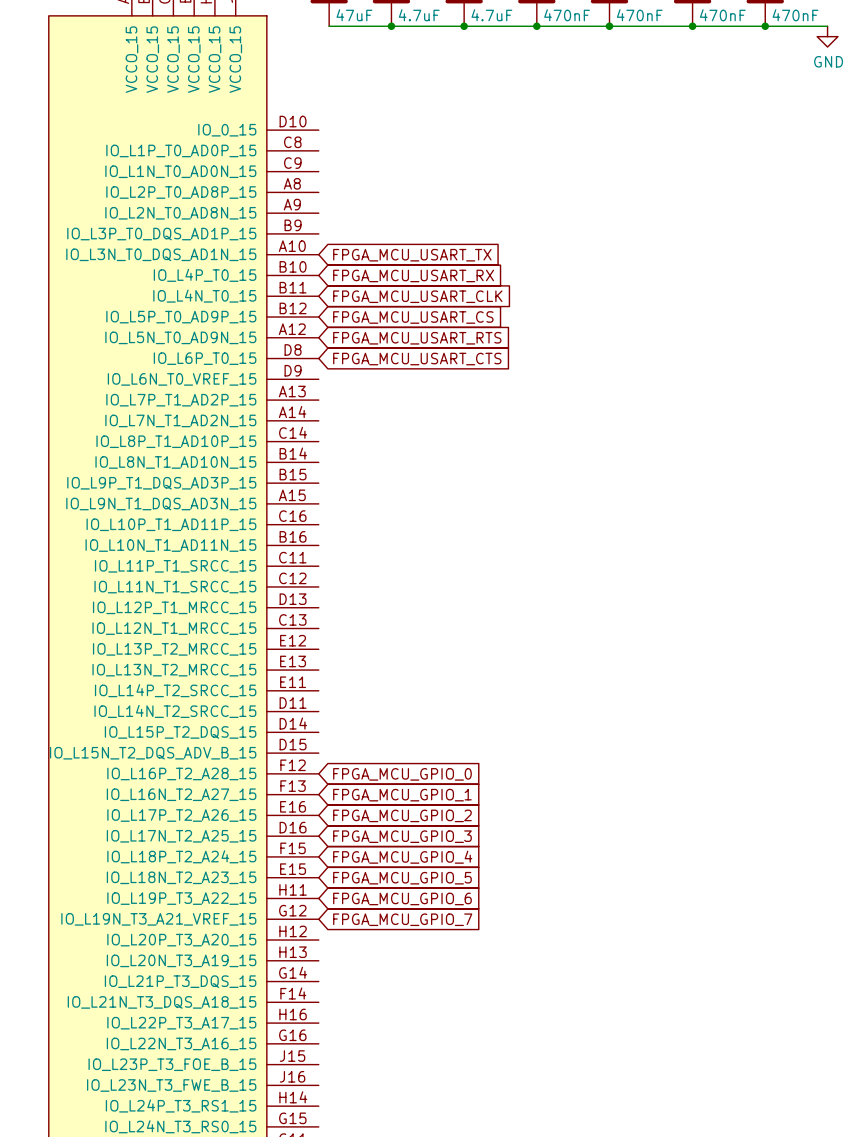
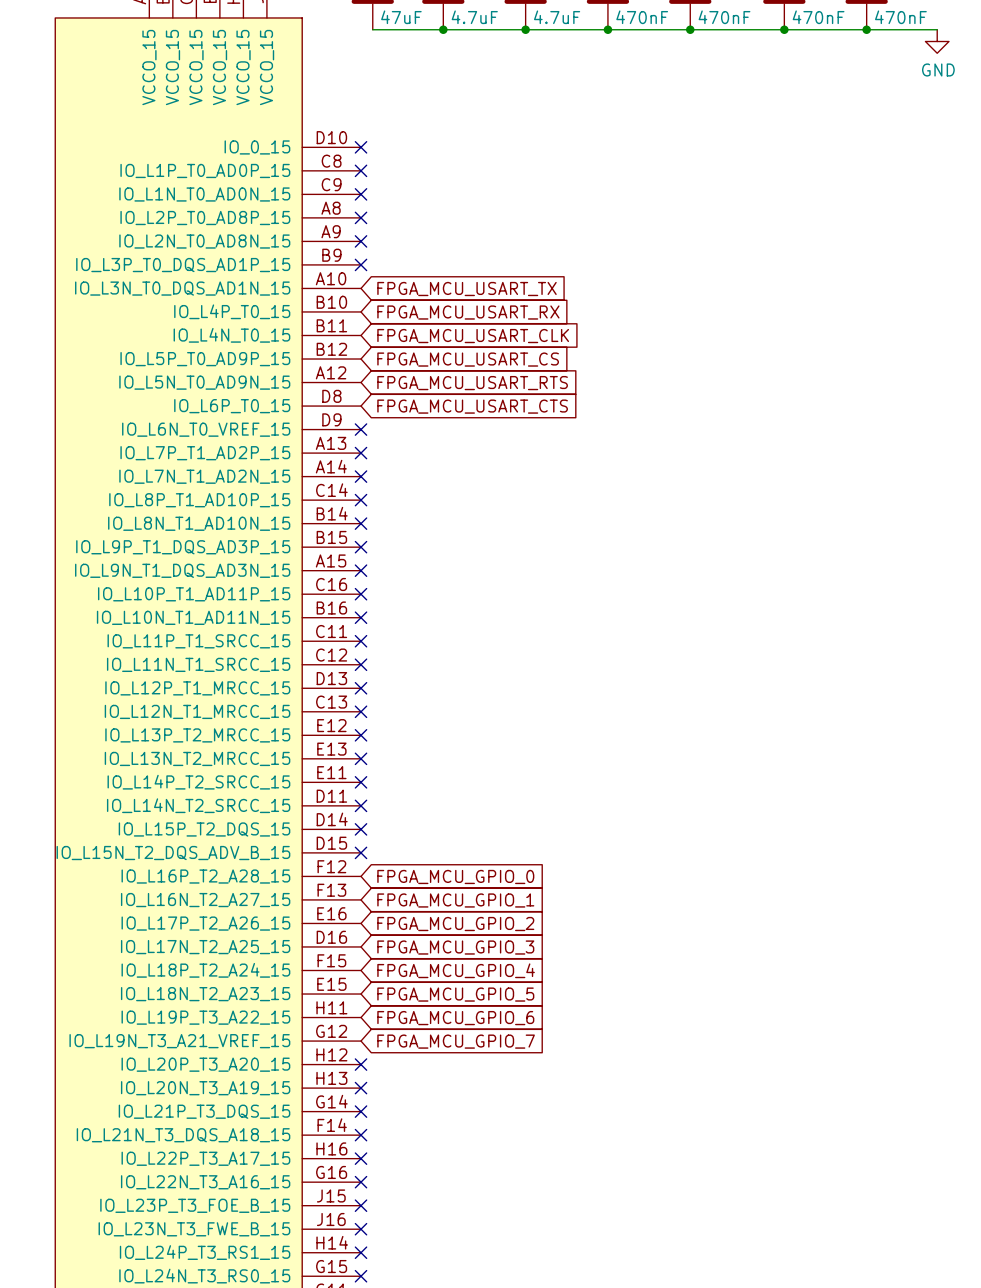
no-connect mark: none -> (361, 147)
no-connect mark: none -> (361, 170)
no-connect mark: none -> (361, 194)
no-connect mark: none -> (361, 217)
no-connect mark: none -> (361, 241)
no-connect mark: none -> (361, 264)
no-connect mark: none -> (361, 429)
no-connect mark: none -> (361, 453)
no-connect mark: none -> (361, 476)
no-connect mark: none -> (361, 500)
no-connect mark: none -> (361, 523)
no-connect mark: none -> (361, 547)
no-connect mark: none -> (361, 570)
no-connect mark: none -> (361, 594)
no-connect mark: none -> (361, 617)
no-connect mark: none -> (361, 641)
no-connect mark: none -> (361, 664)
no-connect mark: none -> (361, 688)
no-connect mark: none -> (361, 711)
no-connect mark: none -> (361, 735)
no-connect mark: none -> (361, 758)
no-connect mark: none -> (361, 782)
no-connect mark: none -> (361, 805)
no-connect mark: none -> (361, 829)
no-connect mark: none -> (361, 852)
no-connect mark: none -> (361, 1064)
no-connect mark: none -> (361, 1088)
no-connect mark: none -> (361, 1111)
no-connect mark: none -> (361, 1135)
no-connect mark: none -> (361, 1158)
no-connect mark: none -> (361, 1182)
no-connect mark: none -> (361, 1205)
no-connect mark: none -> (361, 1229)
no-connect mark: none -> (361, 1252)
no-connect mark: none -> (361, 1276)

